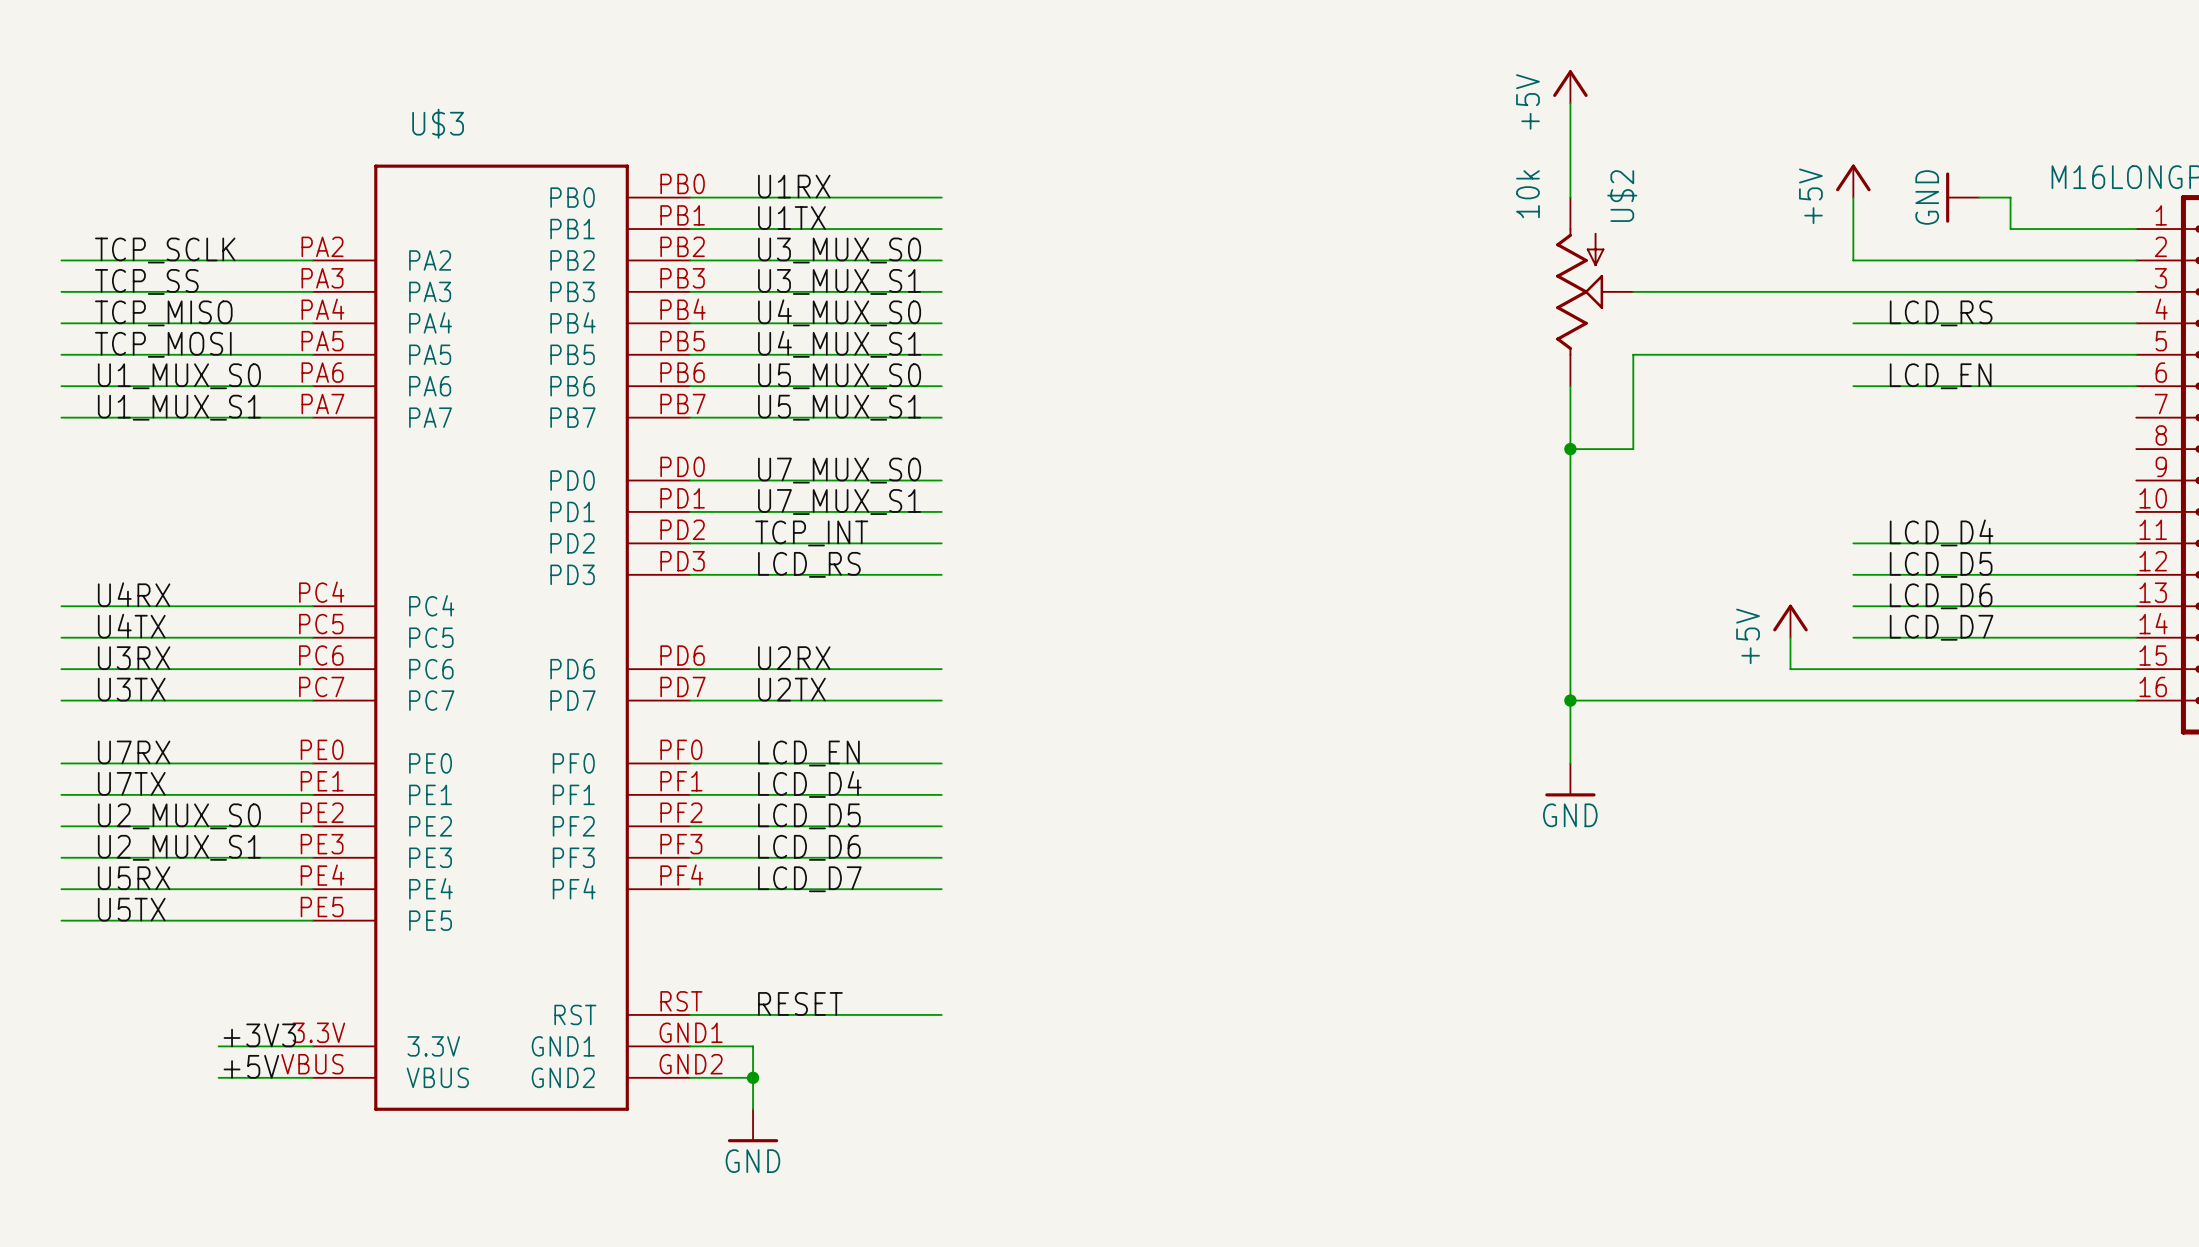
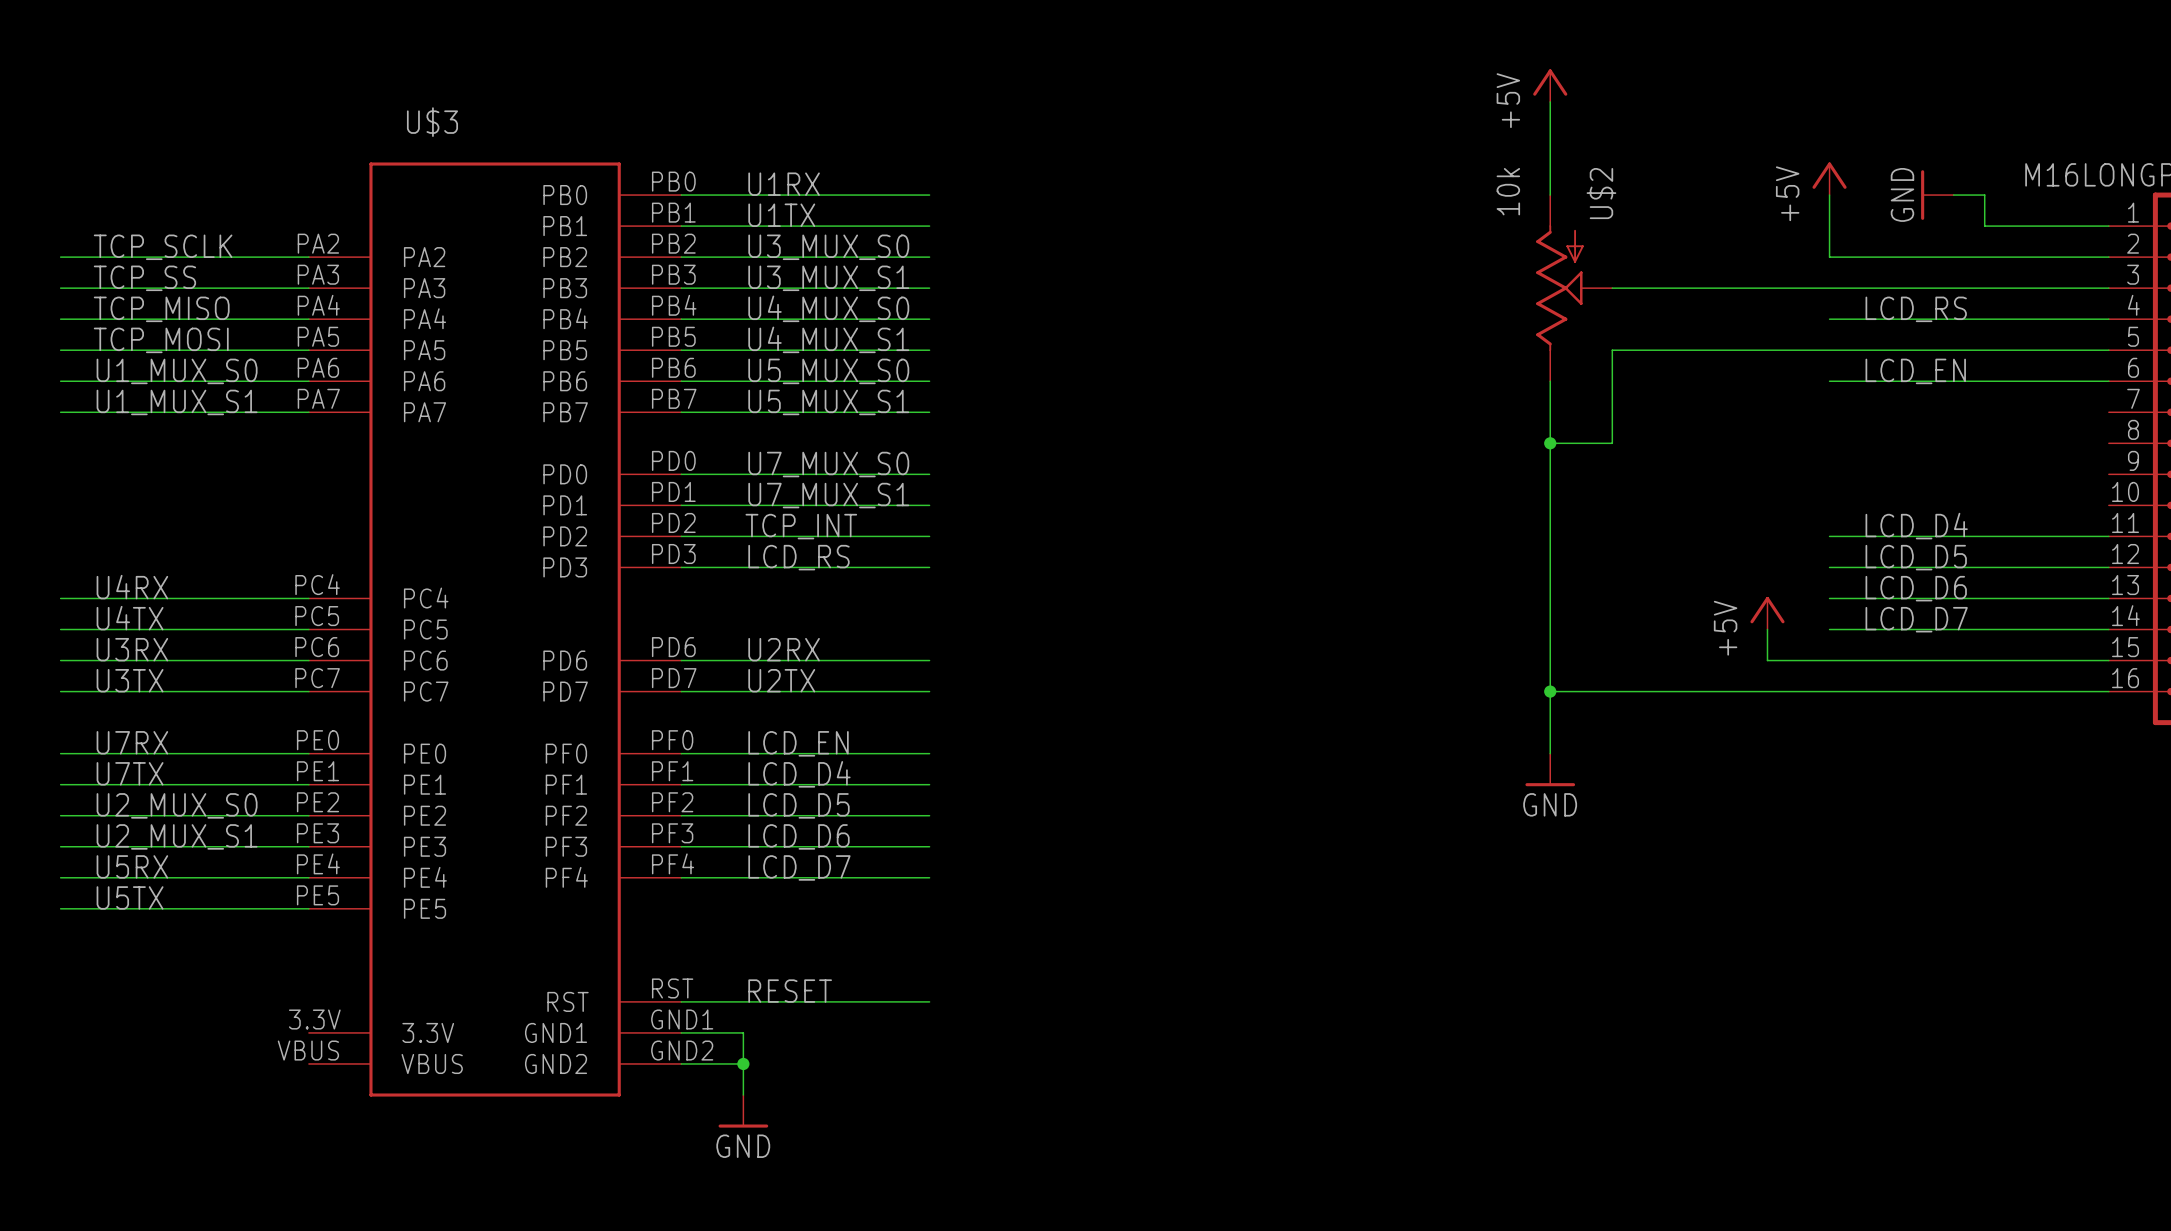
label: +3V3 (259, 1035) -> none
wire: (218, 1046) (312, 1046) -> none
label: +5V (251, 1066) -> none
wire: (218, 1077) (312, 1077) -> none

